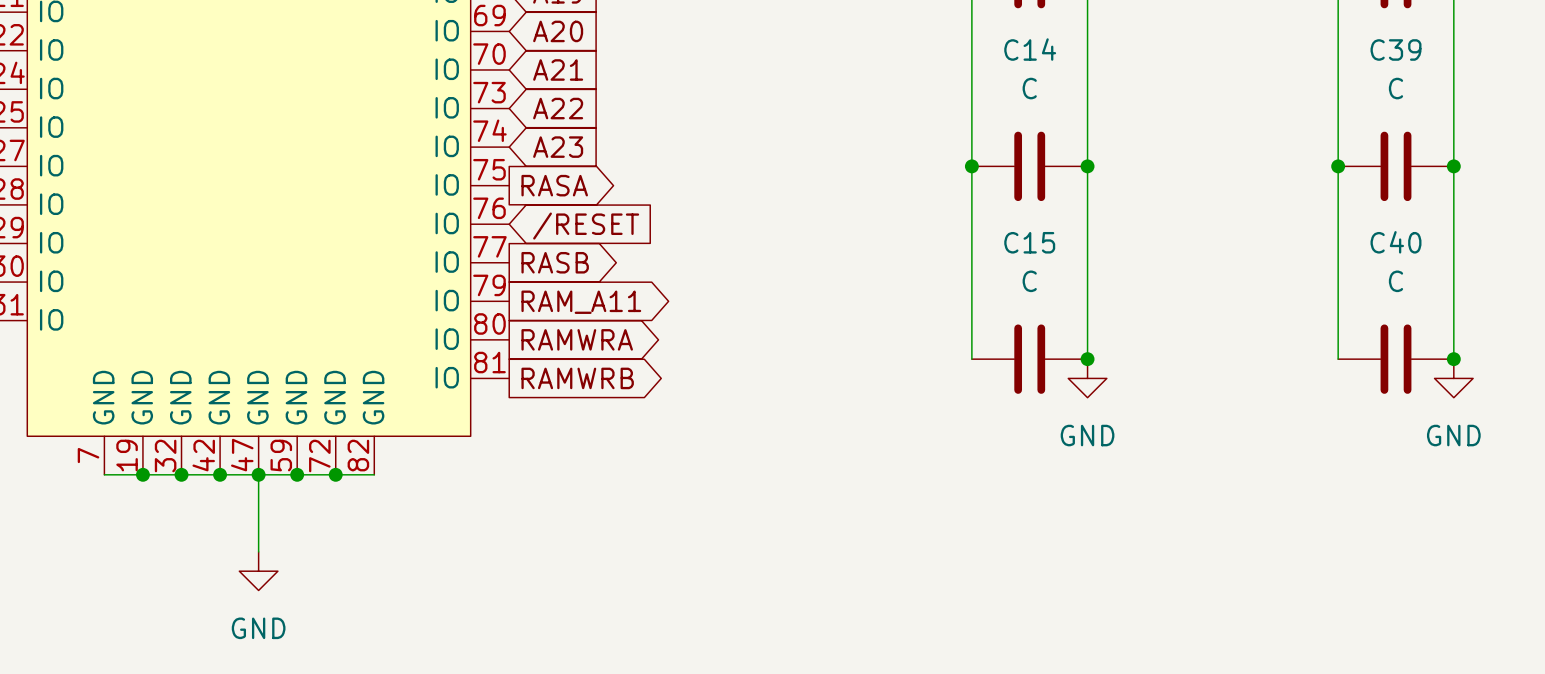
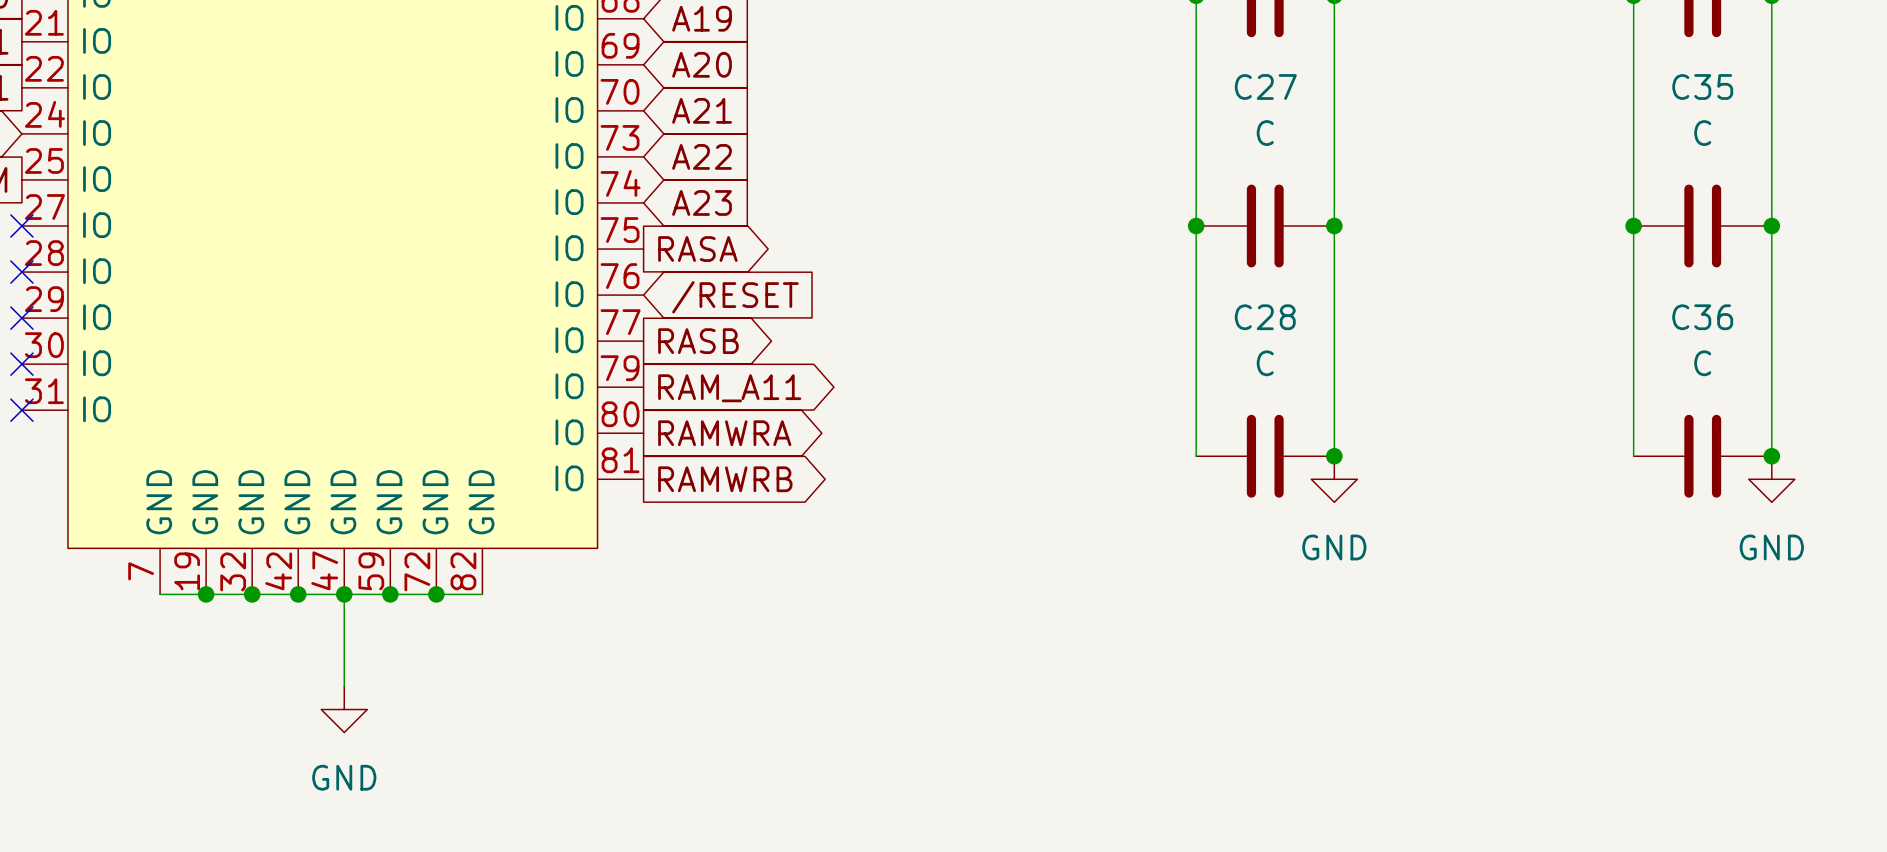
C14 name: C14 (1030, 49) -> C27 (1265, 86)
C39 name: C39 (1395, 49) -> C35 (1702, 86)
C15 name: C15 (1029, 242) -> C28 (1265, 317)
C40 name: C40 (1395, 242) -> C36 (1702, 317)

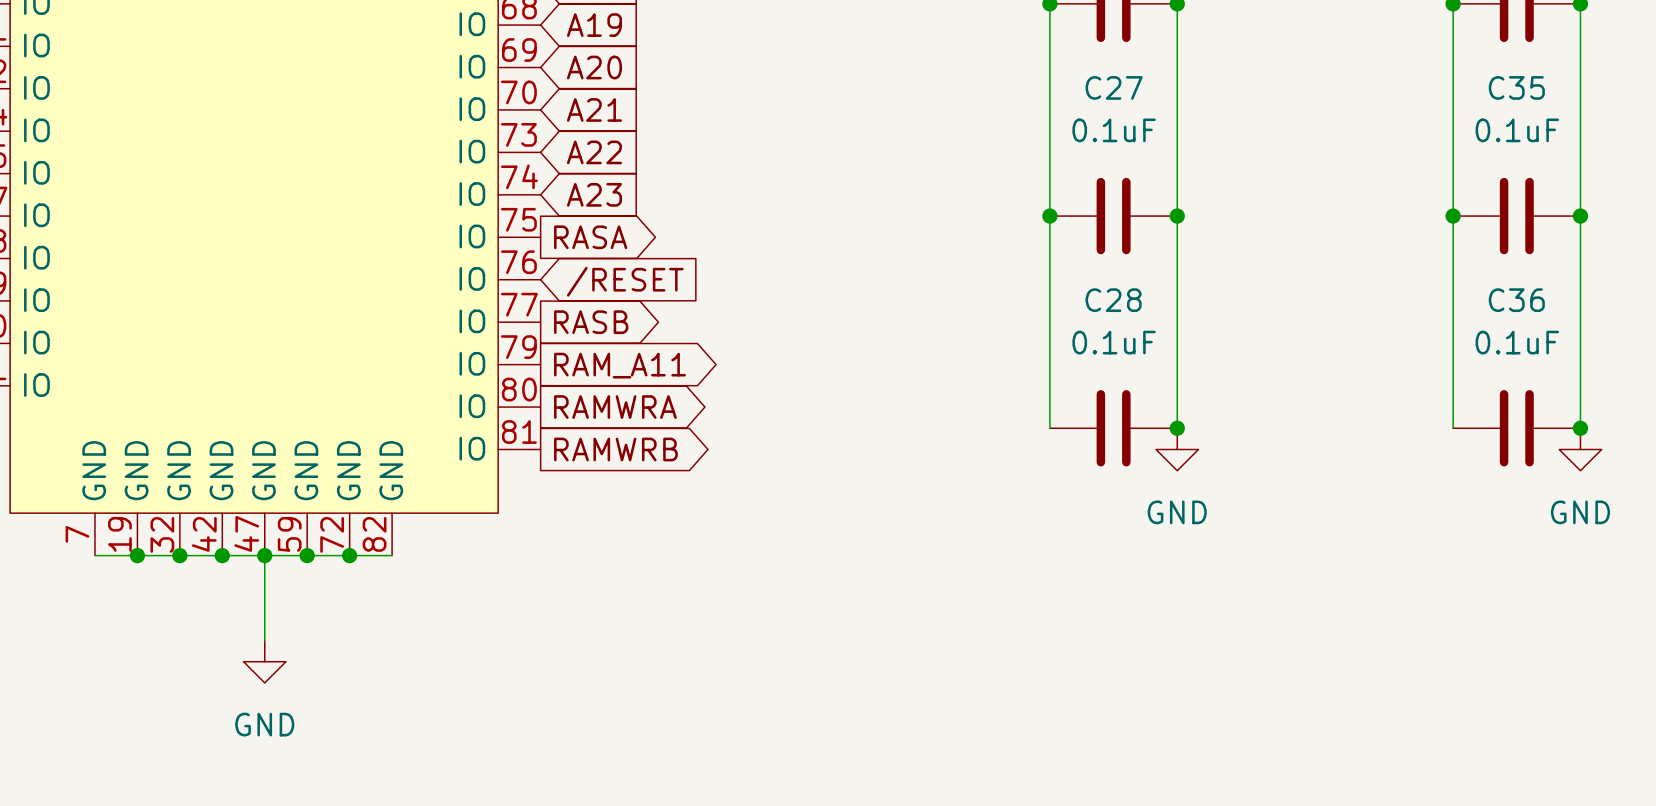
C27 value: C (1265, 133) -> 0.1uF (1114, 130)
C35 value: C (1702, 133) -> 0.1uF (1517, 130)
C28 value: C (1265, 363) -> 0.1uF (1114, 342)
C36 value: C (1702, 363) -> 0.1uF (1517, 342)

